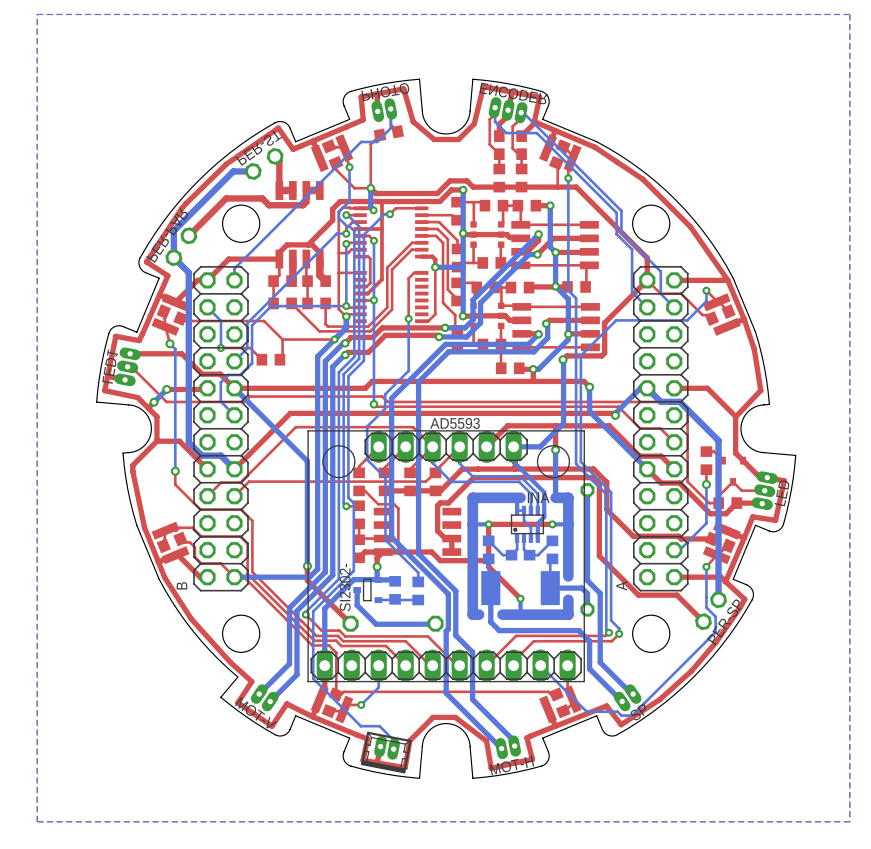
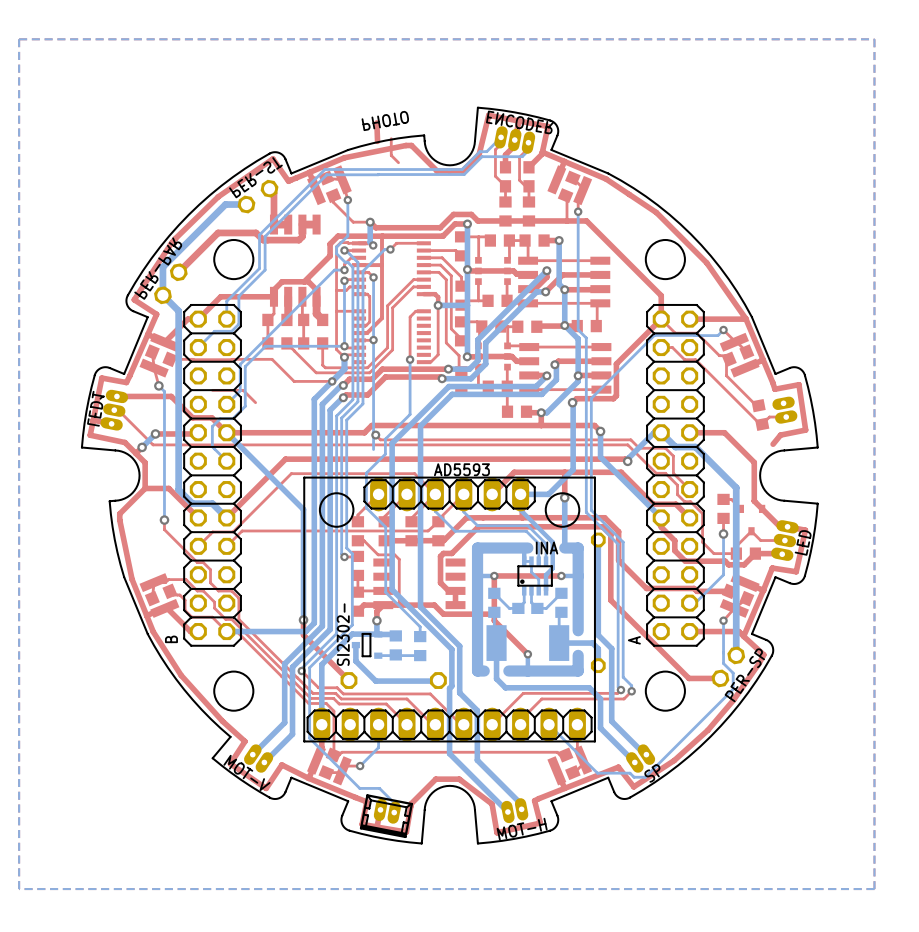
board edge: (472, 79) (468, 119) (460, 129) (452, 133) (437, 132) (427, 125) (422, 114) (419, 79) (407, 80) (348, 92) (344, 95) (343, 101) (349, 119) (295, 141) (287, 124) (282, 121) (276, 122) (251, 137) (218, 162) (198, 180) (170, 211) (140, 257) (138, 263) (141, 269) (159, 278) (136, 332) (119, 325) (113, 327) (109, 331) (101, 367) (96, 402) (134, 405) (142, 410) (149, 419) (151, 431) (146, 443) (137, 450) (123, 453) (133, 513) (159, 579) (171, 601) (201, 641) (237, 677) (220, 697) (247, 717) (277, 735) (282, 735) (287, 732) (295, 715) (349, 738) (343, 755) (344, 761) (349, 765) (384, 773) (419, 778) (424, 737) (431, 728) (440, 724) (455, 725) (464, 732) (469, 743) (472, 778) (484, 777) (543, 765) (547, 761) (549, 755) (542, 738) (596, 715) (604, 732) (609, 735) (616, 735) (640, 720) (673, 695) (694, 676) (721, 645) (752, 599) (753, 593) (750, 587) (733, 579) (755, 525) (773, 531) (779, 530) (782, 526) (791, 490) (795, 455) (757, 451) (747, 445) (742, 437) (741, 425) (745, 414) (755, 406) (769, 404) (761, 355) (755, 332) (733, 278) (719, 254) (694, 220) (665, 189) (620, 155) (596, 141) (542, 119) (549, 101) (547, 95) (543, 92) (507, 83) (472, 79) -> (477, 107) (514, 112) (552, 121) (556, 125) (558, 131) (551, 149) (608, 173) (633, 188) (680, 224) (710, 256) (737, 291) (751, 317) (775, 373) (792, 367) (800, 368) (804, 374) (810, 399) (817, 447) (781, 450) (772, 454) (761, 466) (760, 475) (761, 485) (769, 495) (778, 499) (817, 503) (813, 540) (803, 578) (799, 582) (793, 584) (775, 577) (751, 634) (770, 643) (773, 649) (771, 655) (739, 703) (720, 726) (689, 756) (654, 782) (628, 798) (622, 798) (616, 795) (608, 777) (551, 801) (558, 819) (557, 824) (552, 829) (526, 836) (490, 842) (477, 843) (474, 806) (469, 795) (459, 787) (443, 786) (432, 792) (426, 800) (421, 843) (385, 838) (348, 830) (343, 825) (341, 819) (348, 801) (291, 777) (283, 795) (277, 798) (272, 798) (240, 779) (212, 758) (230, 736) (192, 699) (160, 657) (147, 634) (120, 564) (109, 501) (124, 498) (134, 490) (139, 478) (137, 466) (130, 455) (121, 451) (81, 447) (86, 411) (95, 372) (99, 368) (105, 367) (124, 373) (147, 317) (129, 308) (126, 301) (127, 295) (142, 270) (169, 235) (210, 194) (244, 168) (273, 152) (283, 155) (291, 173) (360, 146) (424, 135) (425, 147) (432, 158) (443, 164) (456, 164) (464, 160) (472, 150) (477, 107)
bottom track: (495, 107) (495, 121) (506, 133) (536, 133) (616, 212) (616, 234) (632, 249) (632, 292) (647, 307) -> none
bottom track: (390, 108) (390, 128) (377, 141) (361, 141) (234, 268) -> (501, 137) (486, 151) (479, 151) (462, 169) (324, 169) (259, 234) (259, 268) (226, 301) (226, 306)
part: (384, 110) -> none
bottom track: (521, 112) (621, 210) (621, 232) (660, 271) (660, 293) (674, 307) -> none
top track: (346, 127) (363, 119) (361, 96) (403, 88) (413, 121) (434, 139) -> (344, 157) (411, 145) (436, 170)
part: (388, 133) -> none
top track: (379, 135) (370, 144) (370, 188) -> none
bottom track: (706, 290) (706, 301) (687, 320) (616, 320) -> (723, 329) (717, 335) (654, 335) (628, 361)
bottom track: (207, 307) (220, 320) (220, 348) -> (198, 347) (214, 331) (231, 331) (238, 324) (238, 296) (265, 270) (265, 236) (326, 174) (464, 174) (482, 156) (522, 156) (528, 150) (528, 142)
top track: none -> (661, 347) (672, 347) (684, 359) (695, 359) (760, 424) (769, 417) (786, 417)
top track: (180, 318) (182, 321) (264, 321) (282, 339) -> (169, 359) (272, 359) (294, 381)
top track: none -> (729, 359) (726, 362) (726, 375) (756, 405) (758, 405)
top track: (744, 319) (754, 349) (760, 390) (735, 416) -> (763, 359) (774, 389) (798, 384) (805, 430) (780, 435) (773, 444)
top track: (282, 339) (282, 357) (279, 359) -> none
top track: (298, 339) (282, 339) -> none
via: (220, 348) -> none
part: (270, 359) -> none
part: none -> (784, 410)
part: none -> (760, 414)
top track: (164, 399) (166, 401) (244, 401) (250, 396) (382, 396) (387, 401) (680, 401) (687, 408) (687, 481) (709, 503) -> (153, 444) (627, 444) (656, 473) (665, 473) (677, 485) (677, 494) (684, 501) (690, 501) (702, 513) (702, 542) (713, 553) (726, 553)
top track: (373, 404) (376, 406) (618, 406) (640, 428) (660, 428) -> (375, 435) (380, 439) (630, 439) (639, 448) (665, 448) (673, 456) (673, 473) (675, 475)
via position: (373, 404) -> (375, 435)
top track: (647, 469) (661, 483) (679, 483) (711, 513) -> (661, 517) (661, 527) (674, 540) (674, 550) (685, 561) (725, 561) (728, 564)
top track: (175, 480) (175, 484) (200, 509) (240, 509) (252, 520) (252, 571) -> (164, 529) (197, 562) (203, 562) (210, 569) (210, 582) (218, 591) (231, 591) (238, 598) (238, 619) (245, 626)
top track: (192, 527) (201, 536) (240, 536) (247, 543) (247, 573) -> (182, 579) (186, 579) (197, 591) (203, 591) (214, 602) (214, 608) (225, 619) (231, 619) (240, 628)
top track: (599, 547) (599, 555) (638, 595) (676, 595) (703, 621) -> (610, 600) (688, 678) (720, 678)

